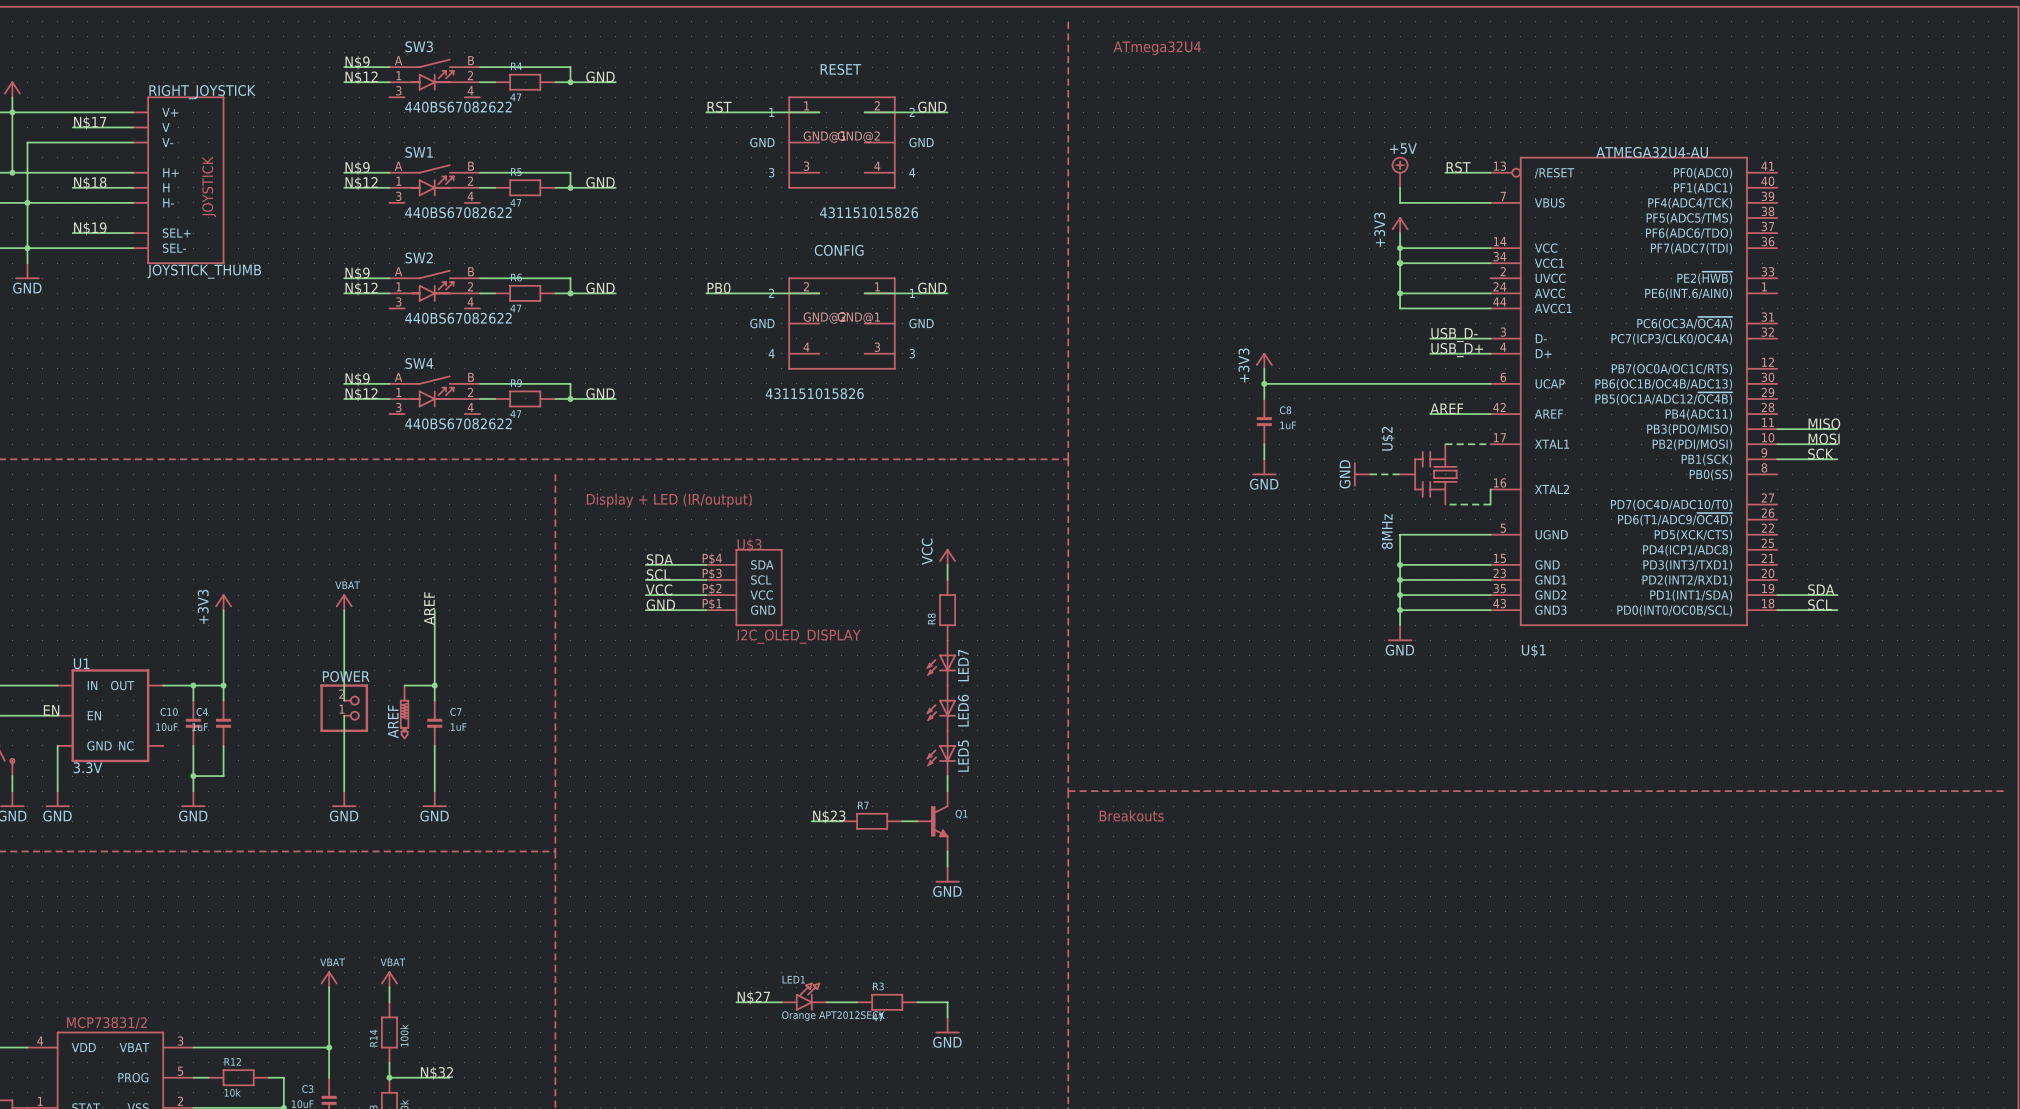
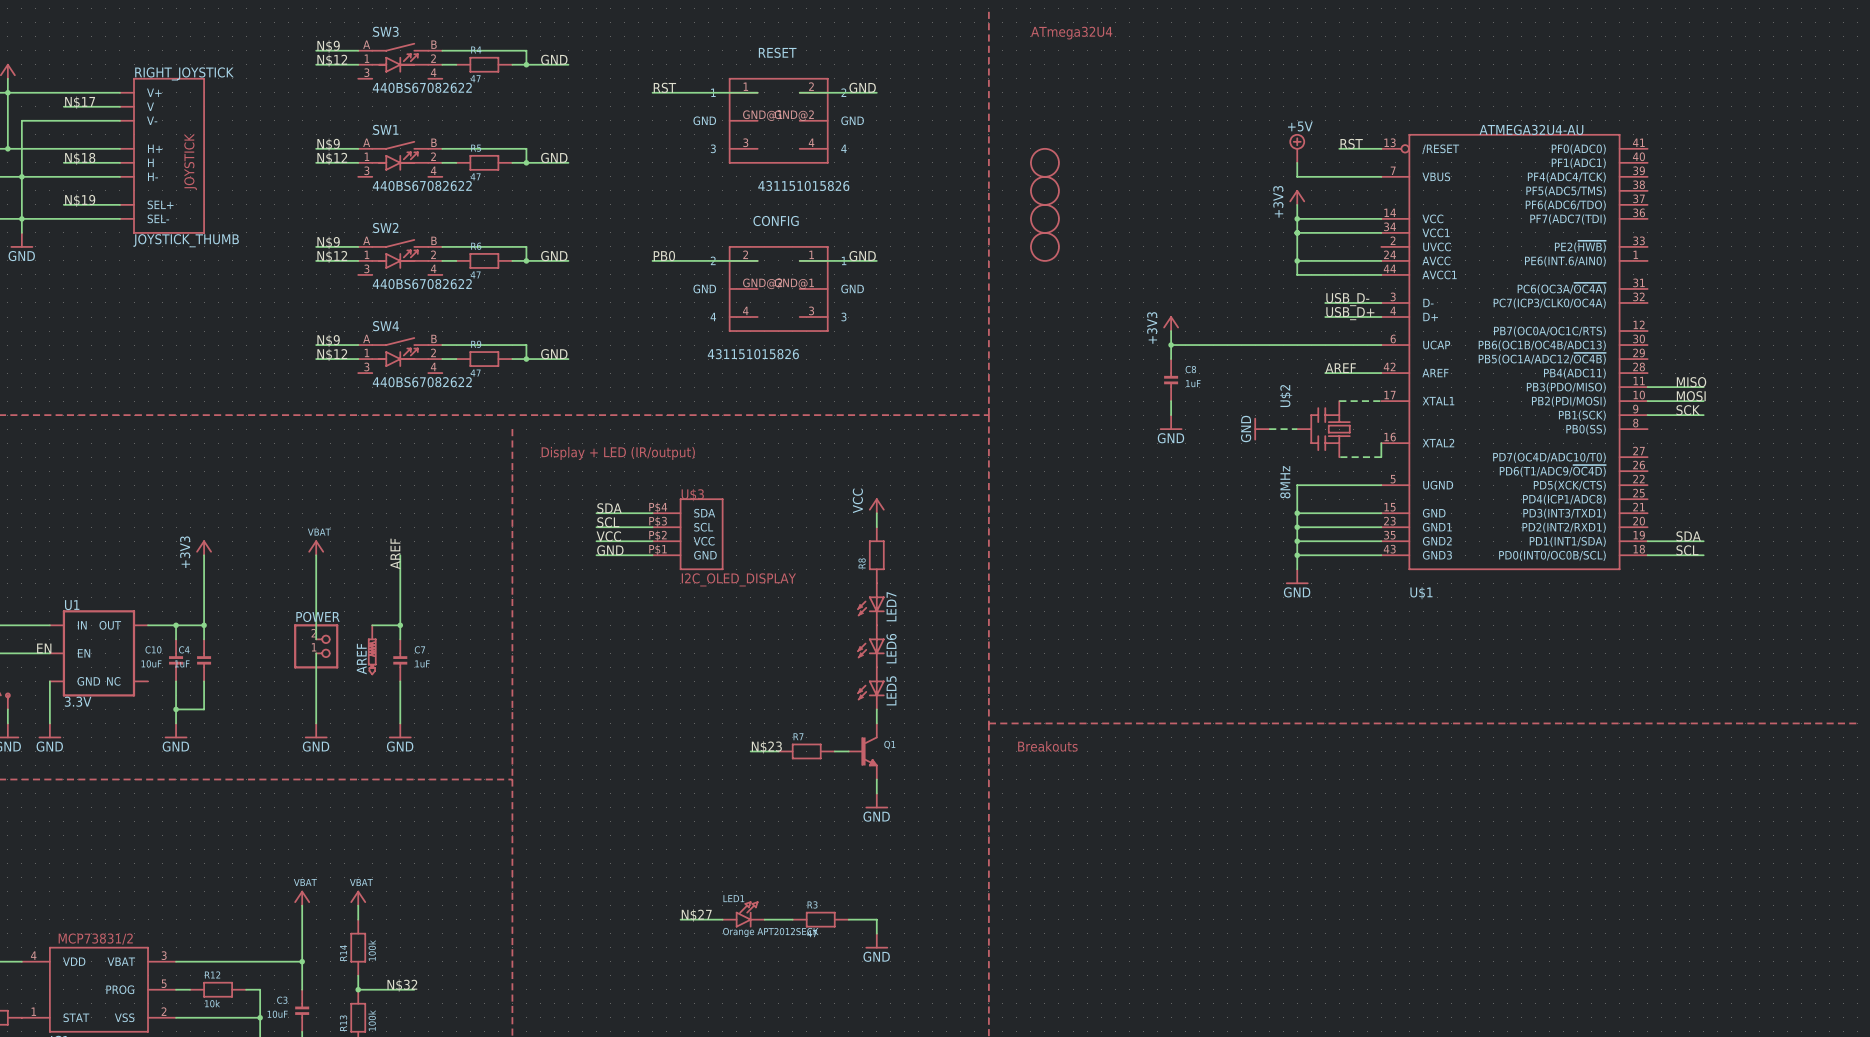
part: none -> (1044, 162)
part: none -> (1044, 190)
part: none -> (1044, 218)
part: none -> (1044, 246)

